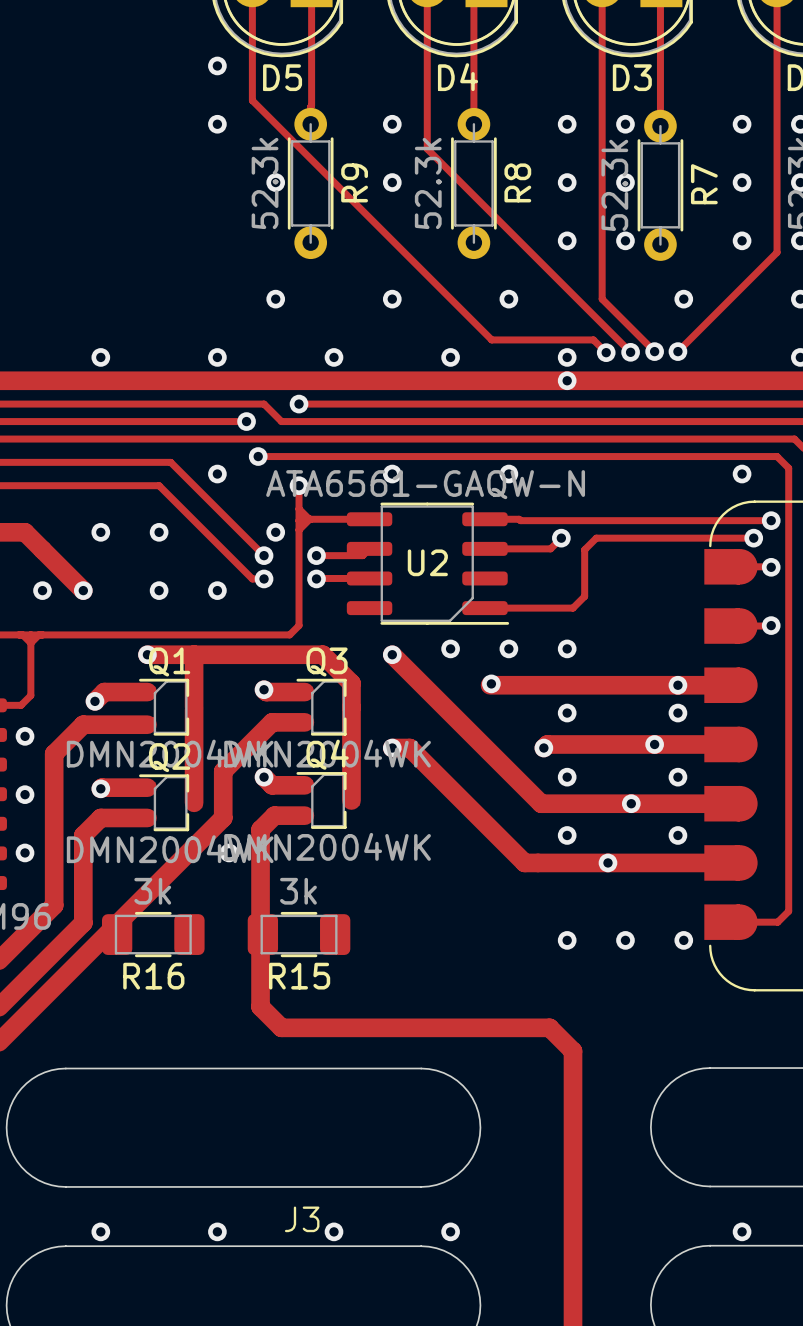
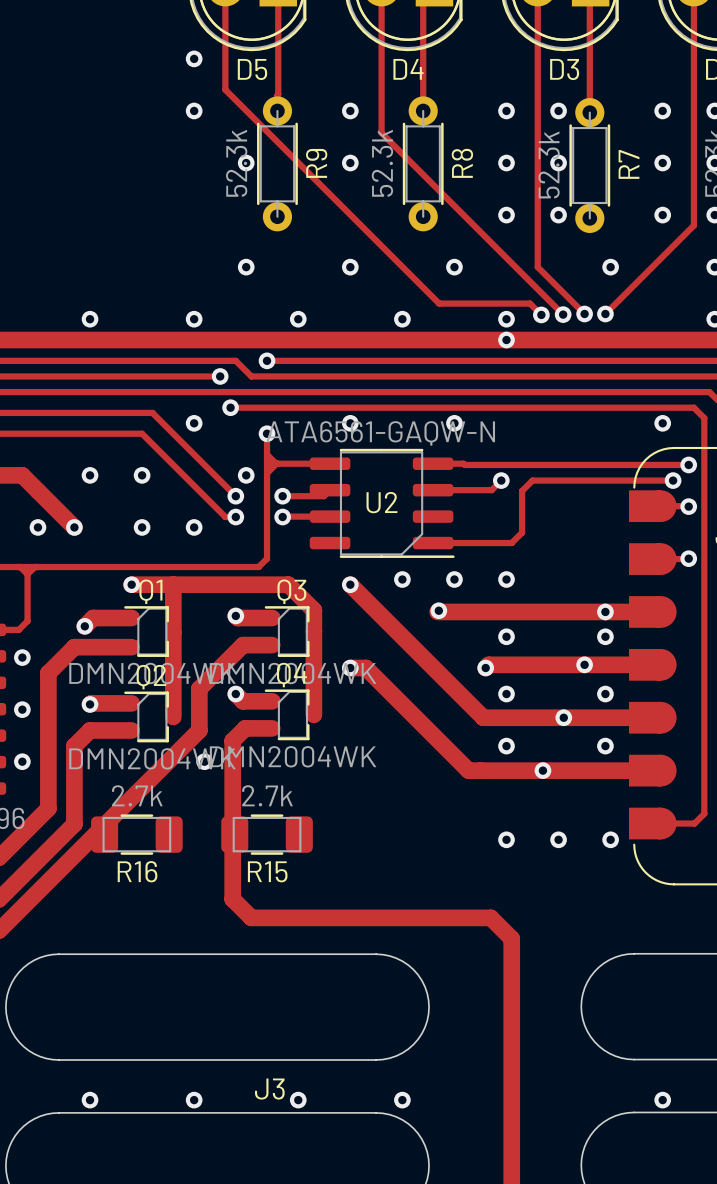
R16 value: 3k (152, 891) -> 2.7k (137, 795)
R15 value: 3k (298, 891) -> 2.7k (267, 795)

